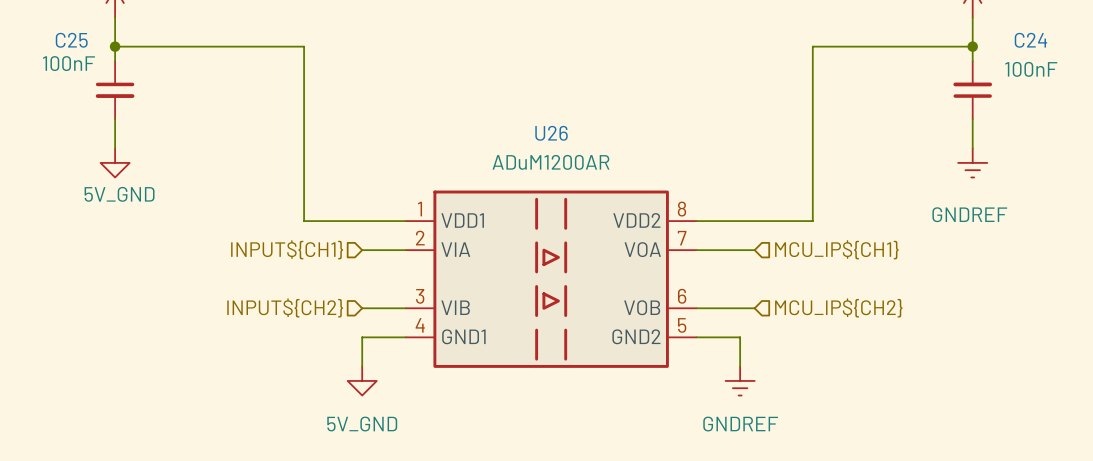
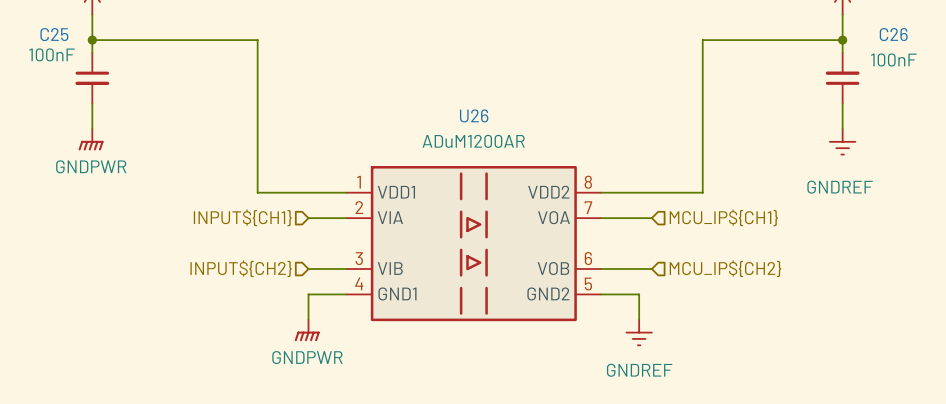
C24 name: C24 (1030, 40) -> C26 (893, 34)
power symbol: 5V_GND (115, 162) -> GNDPWR (91, 139)
power symbol: 5V_GND (362, 380) -> GNDPWR (307, 330)

